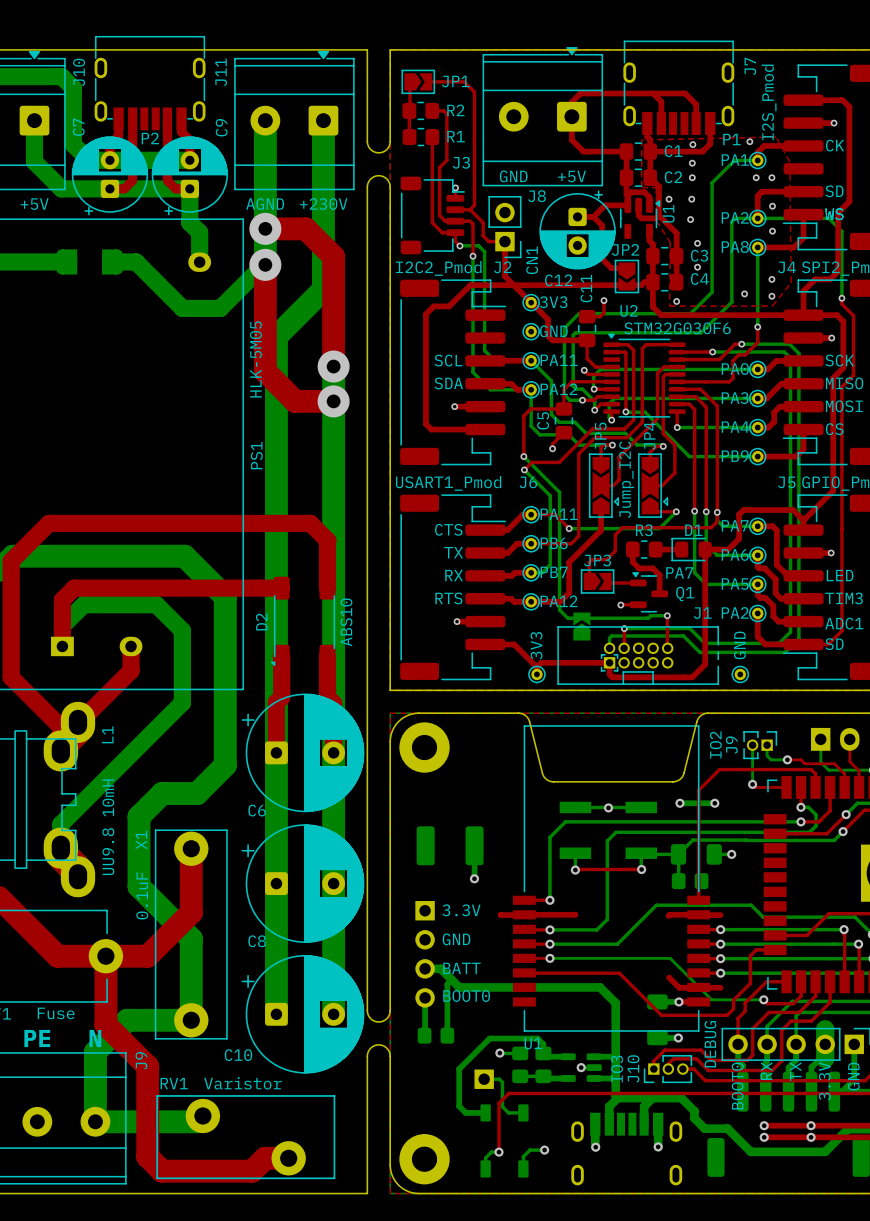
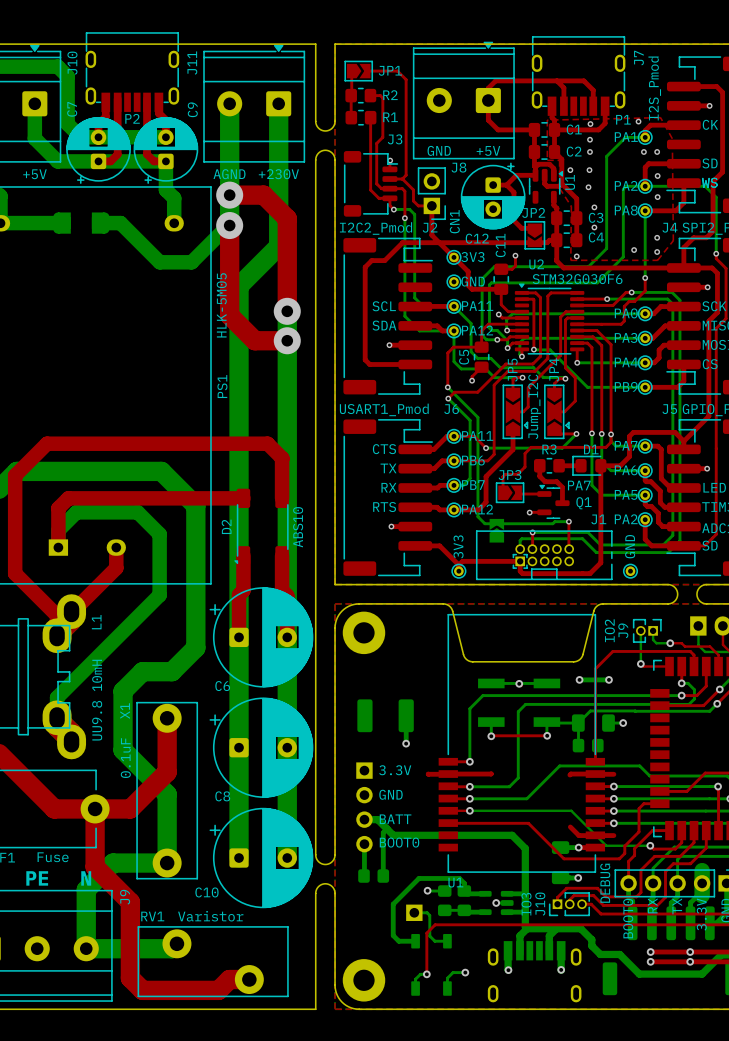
board edge: (784, 690) (830, 690) -> (668, 584) (674, 587) (677, 594) (674, 601) (668, 603)
board edge: (784, 713) (830, 713) -> (706, 584) (699, 587) (696, 594) (699, 601) (706, 603)

